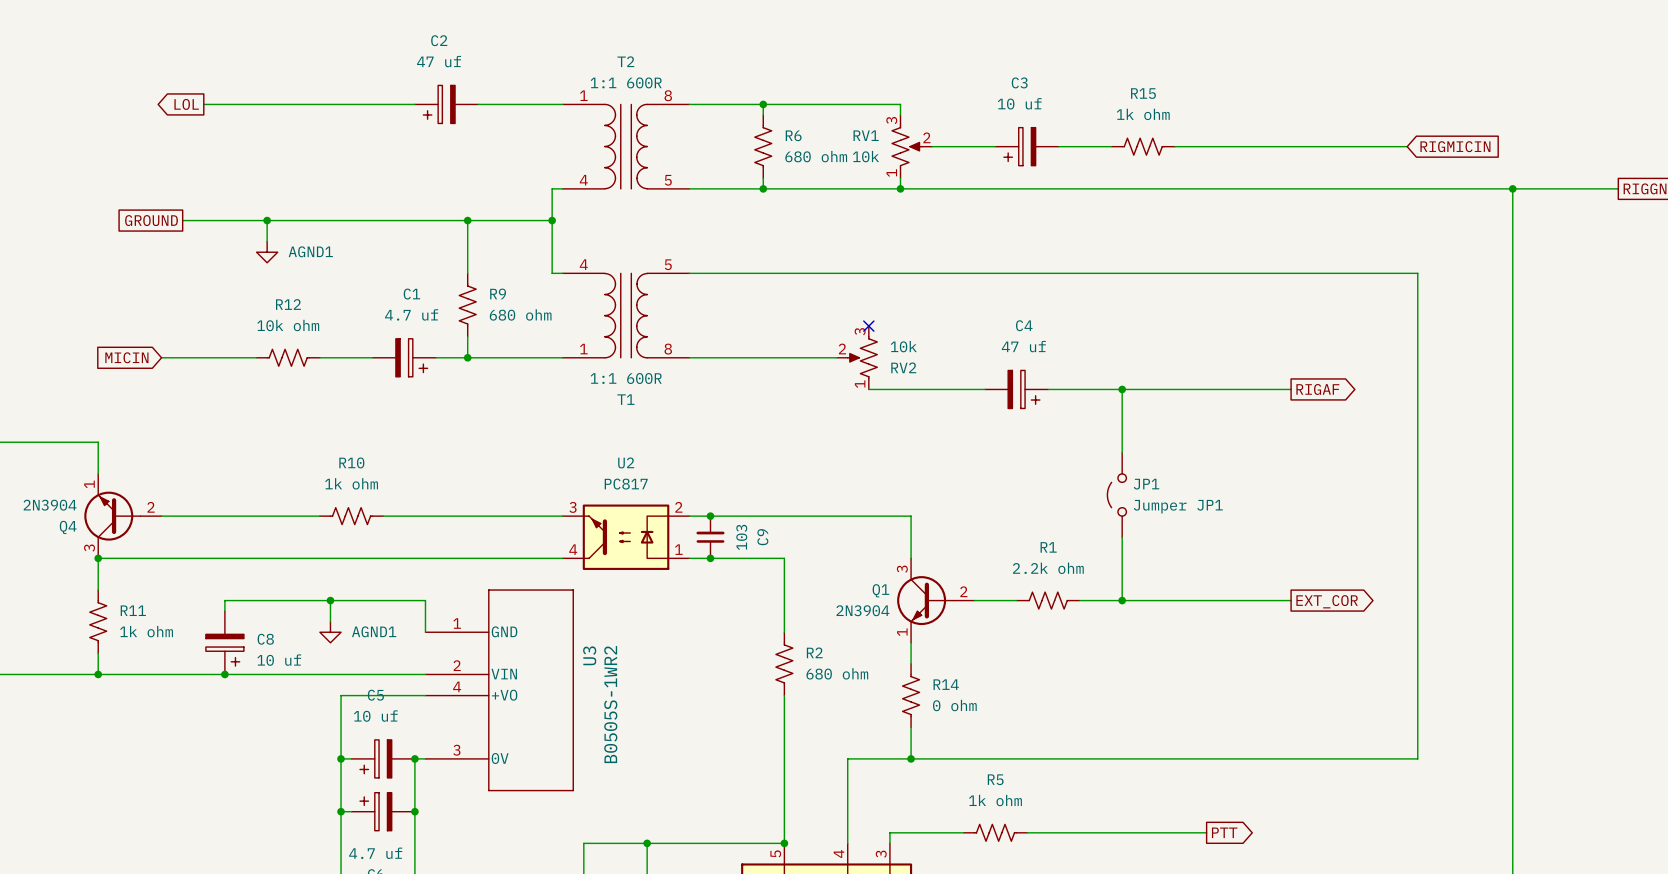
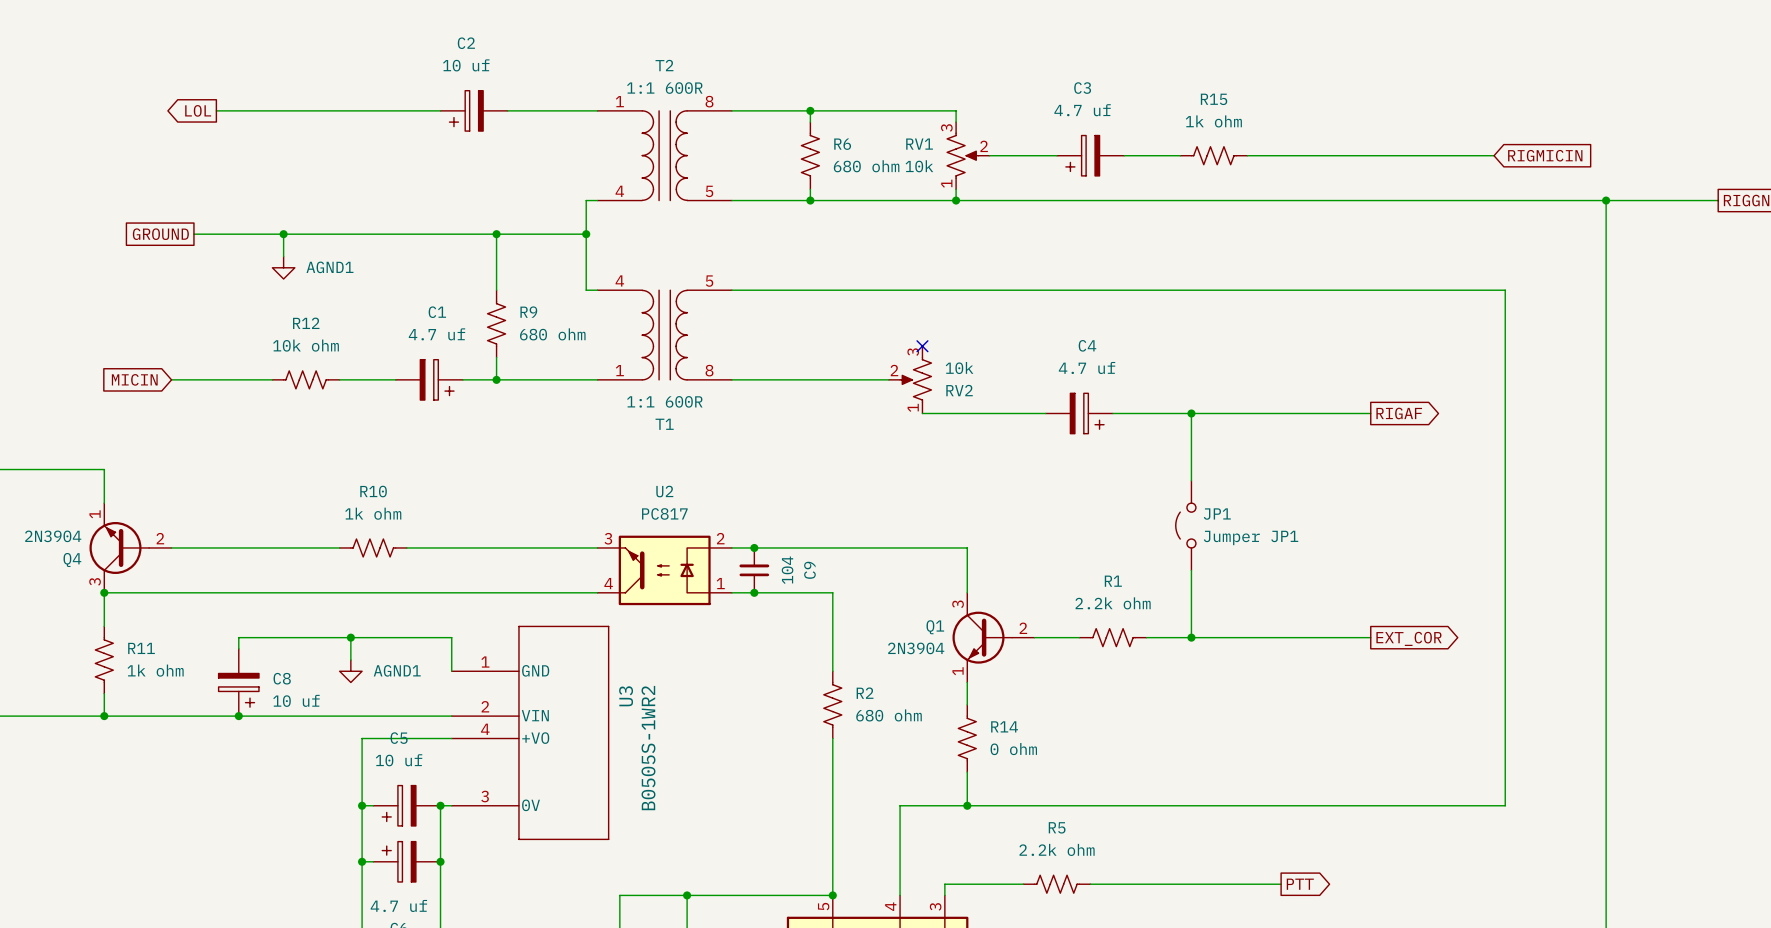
C2 value: 47 uf (439, 61) -> 10 uf (466, 65)
C3 value: 10 uf (1019, 103) -> 4.7 uf (1082, 110)
C4 value: 47 uf (1023, 346) -> 4.7 uf (1087, 368)
C9 value: 103 (741, 537) -> 104 (787, 570)
R5 value: 1k ohm (995, 800) -> 2.2k ohm (1057, 849)

